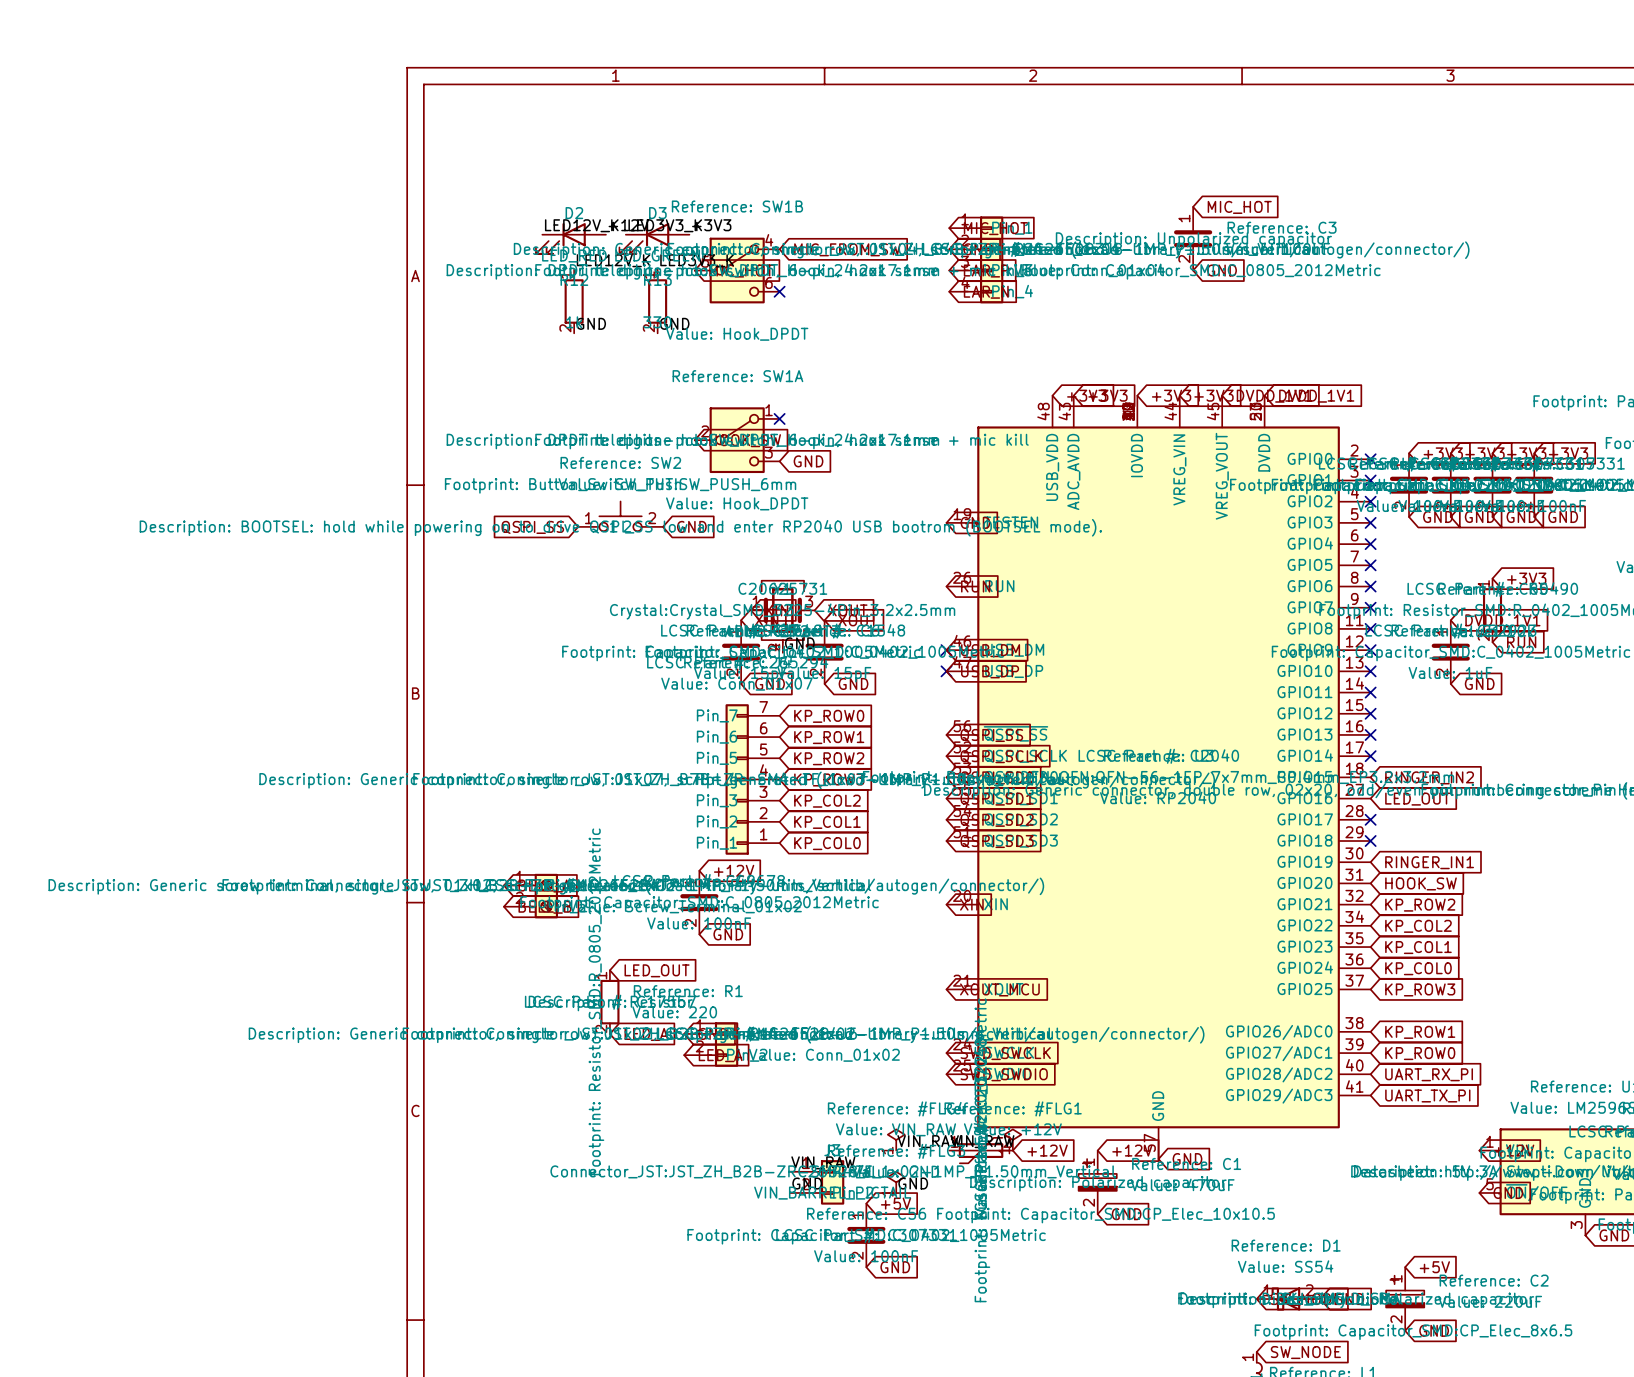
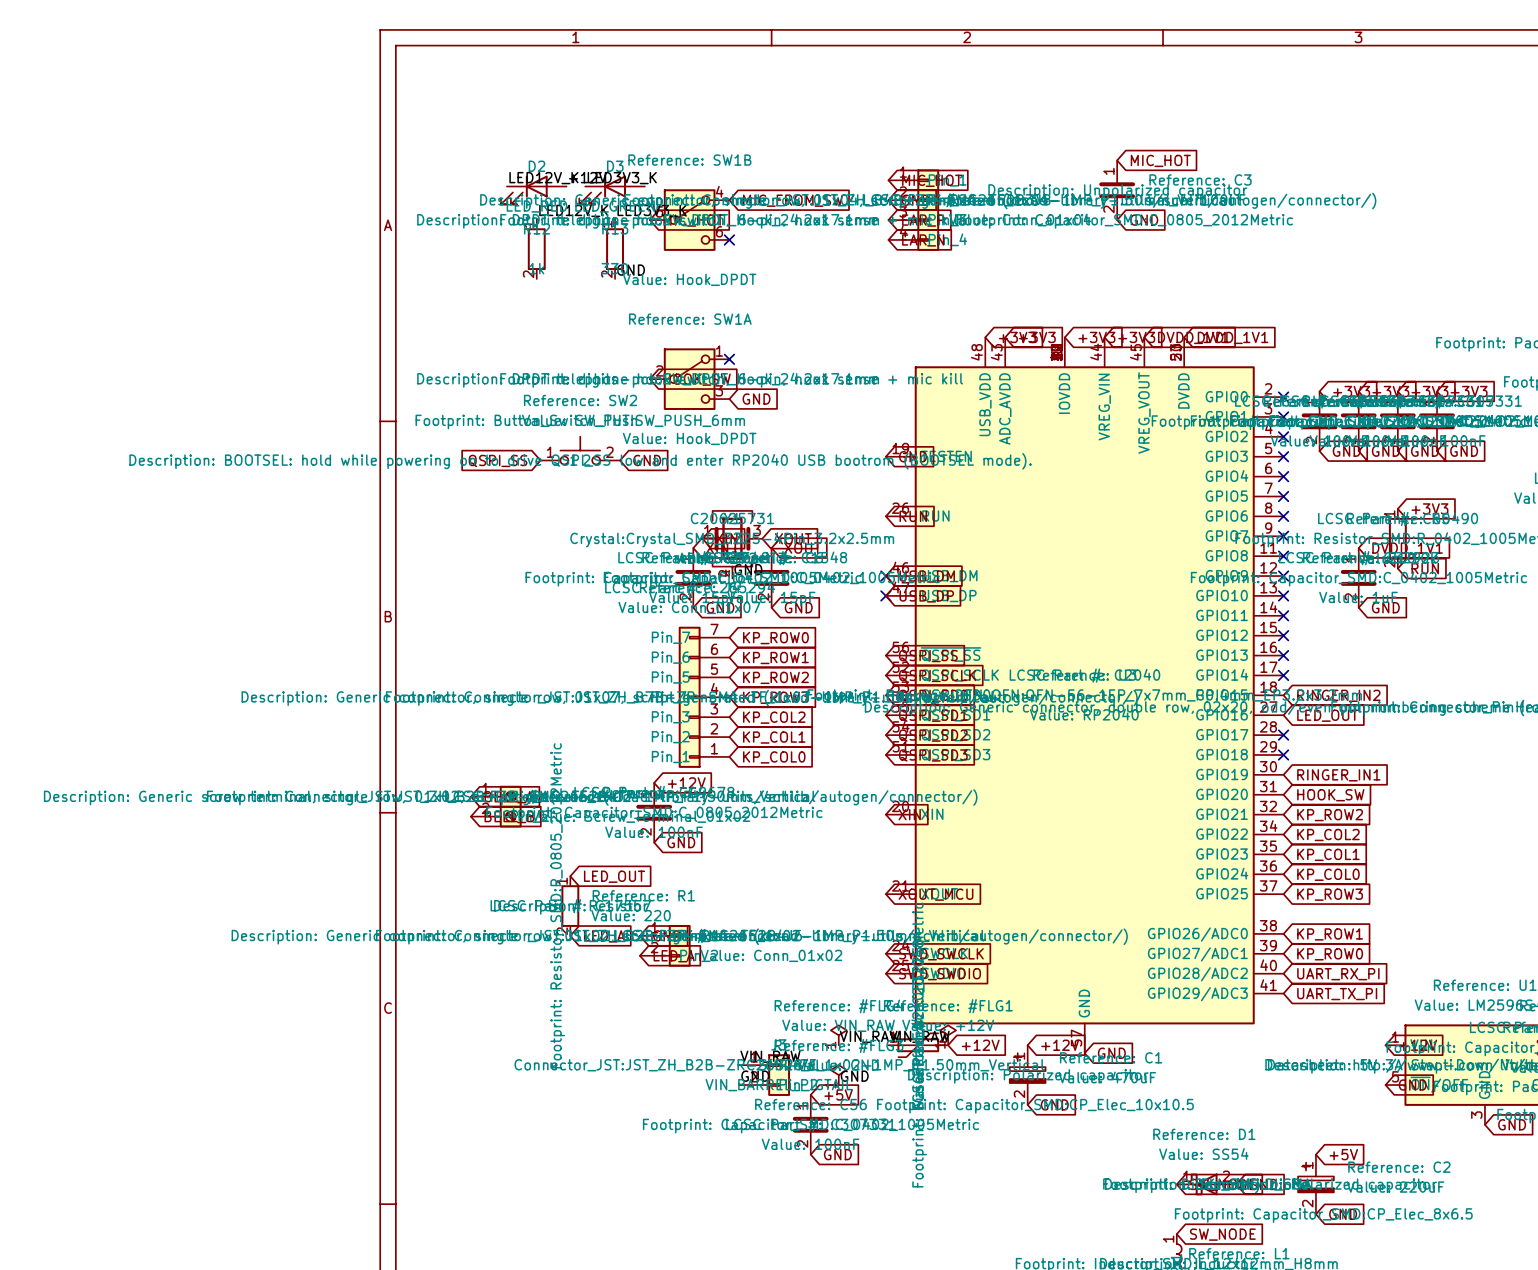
label: +3V3 (711, 225) -> none
label: GND (591, 323) -> none

